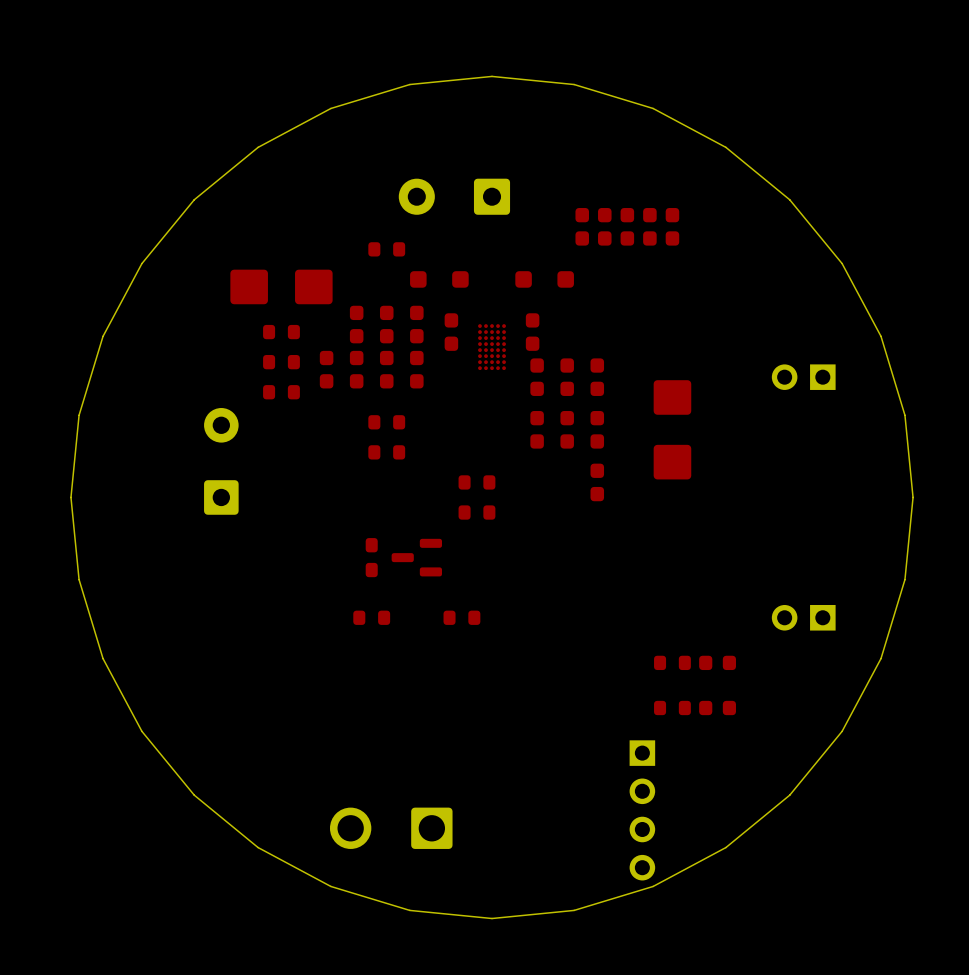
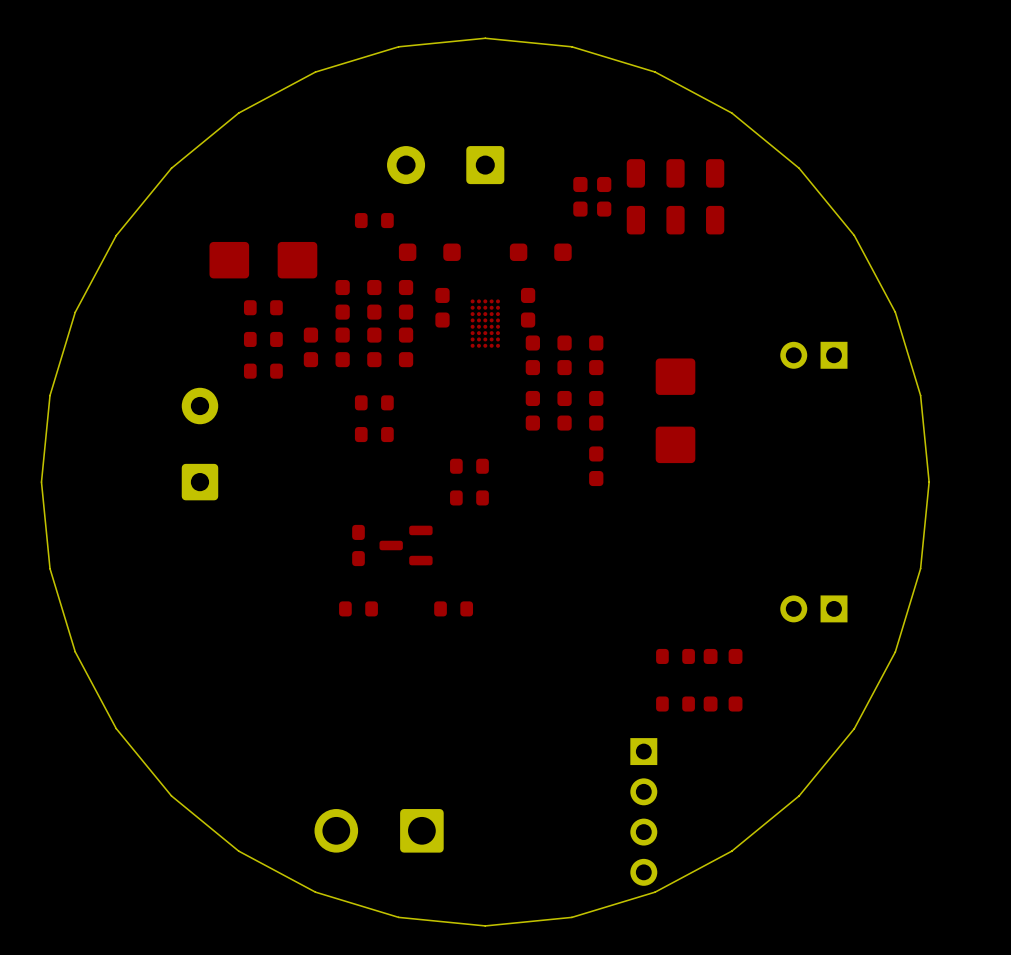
part footprint: [665, 208, 680, 246] -> [666, 159, 685, 235]
part: (627, 226) -> none
part: none -> (635, 196)
part: (649, 226) -> none
part: none -> (715, 196)

